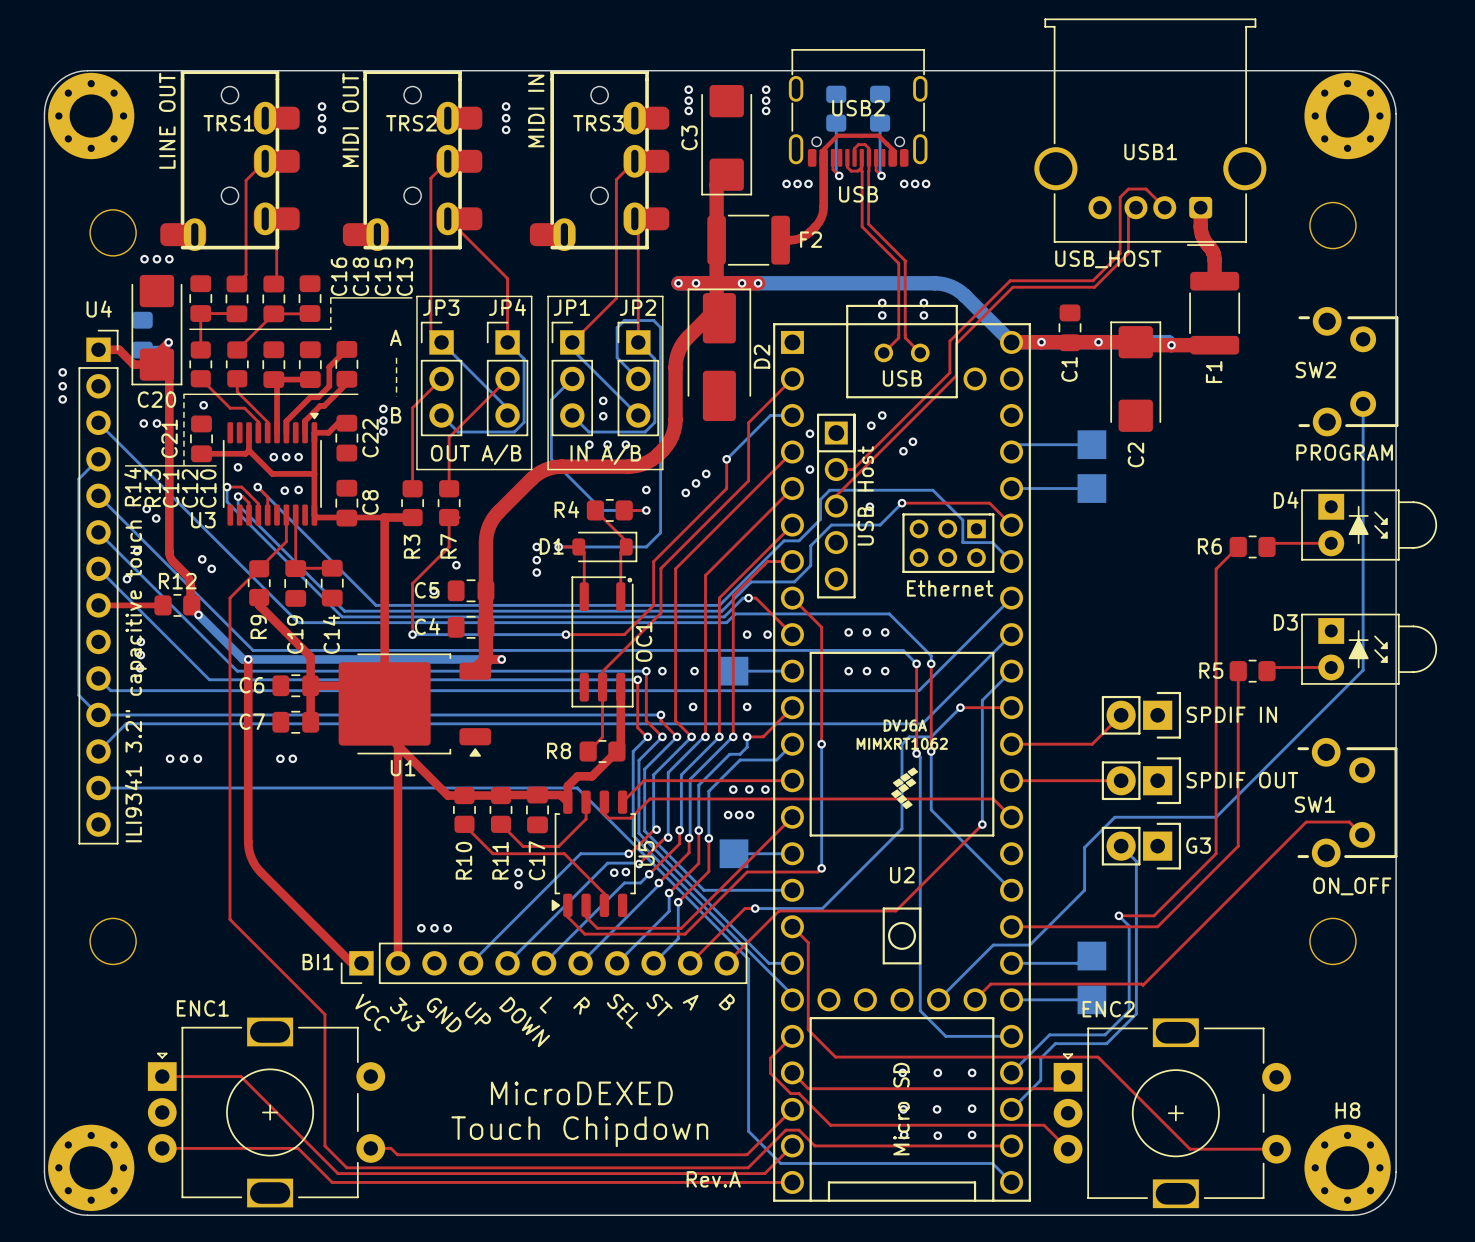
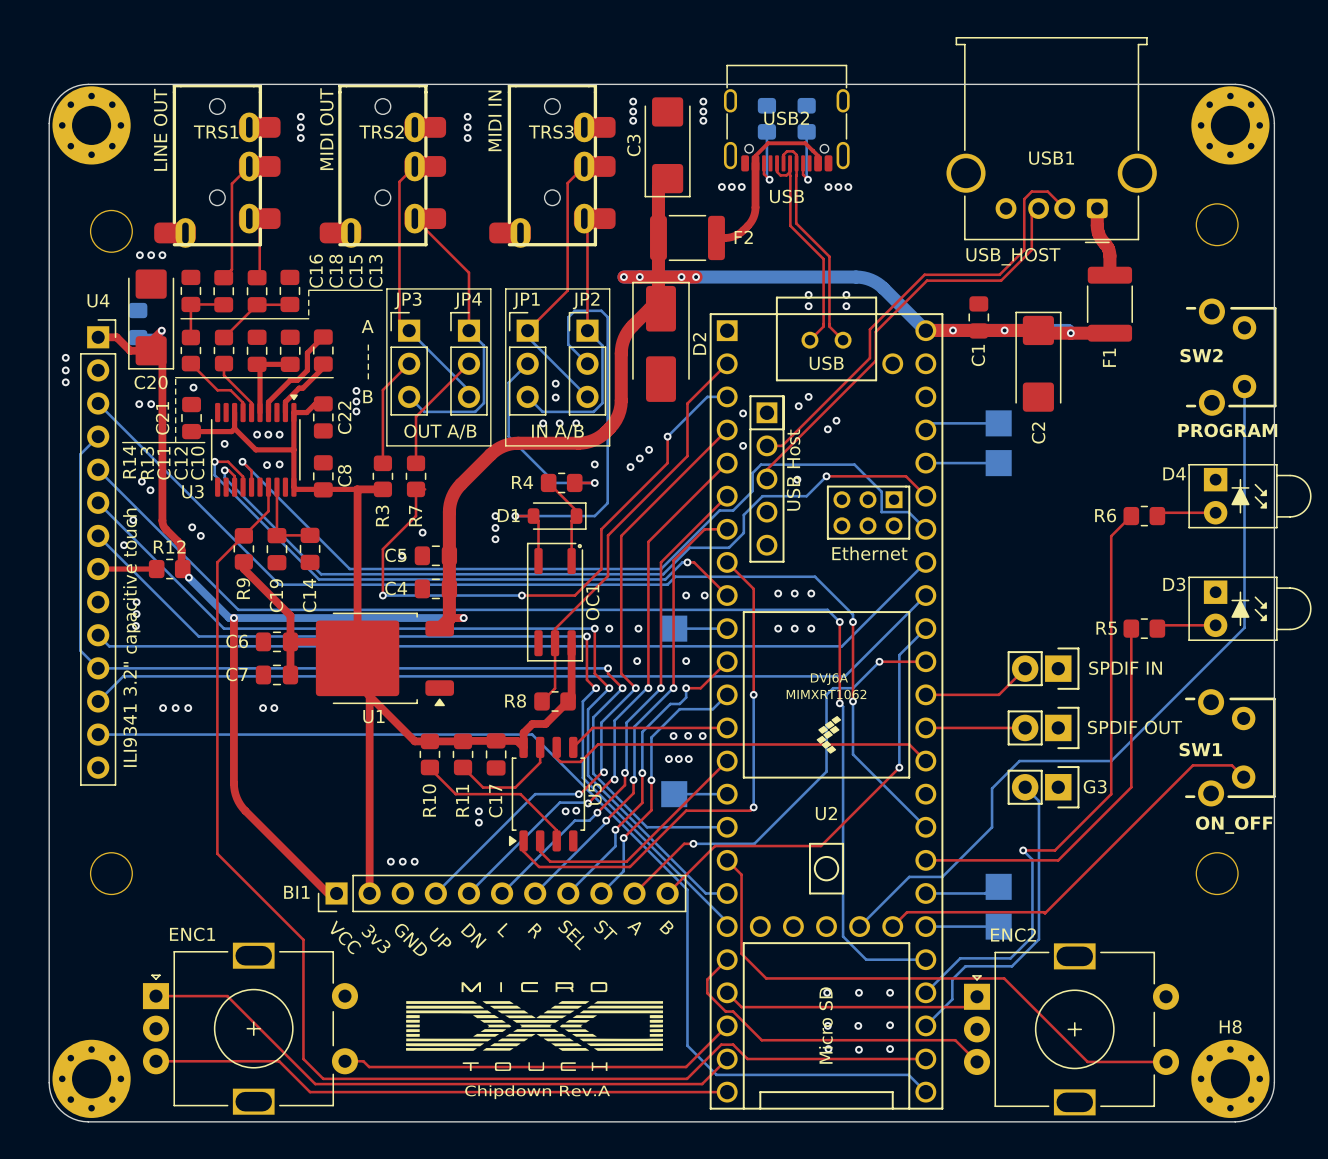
text: DOWN (524, 1021) -> DN (473, 935)
drawing: none -> [406, 982, 664, 1071]
text: MicroDEXED (581, 1093) -> none
text: Touch Chipdown (579, 1131) -> none
text: Rev.A (713, 1179) -> none
text: none -> Chipdown Rev.A (537, 1092)

